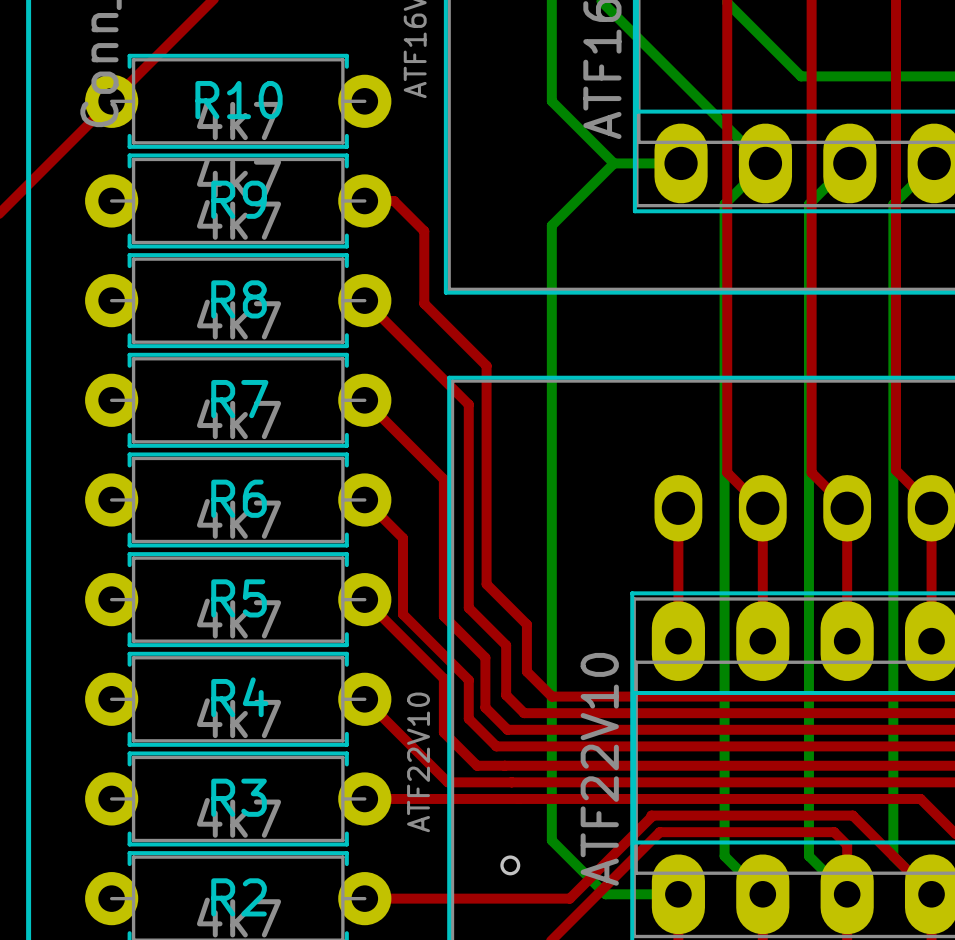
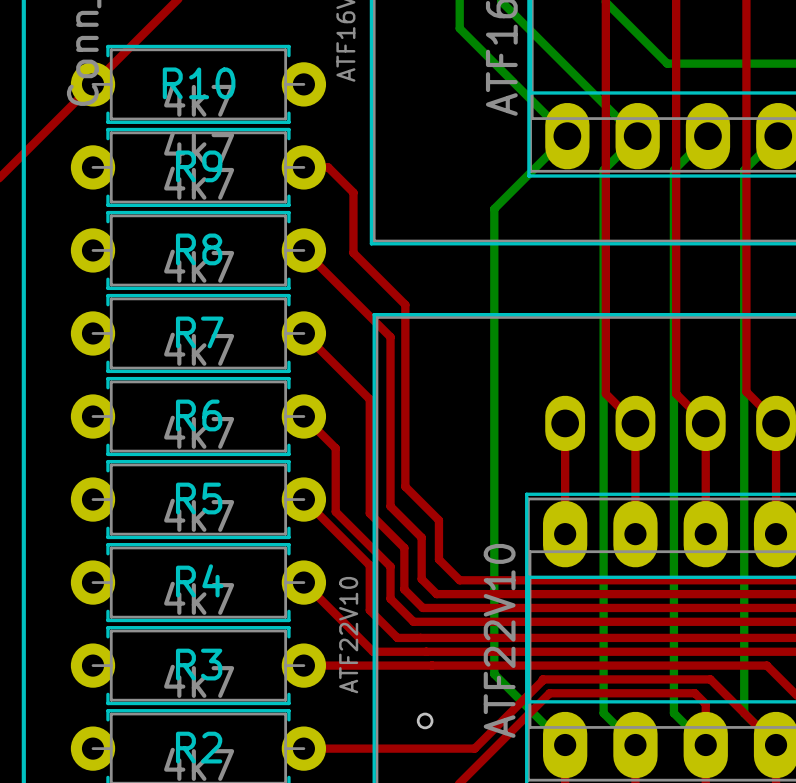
bottom track: (551, 34) (551, 101) (613, 163) -> (459, 28) (567, 136)
bottom track: (613, 163) (551, 225) (551, 840) (605, 894) (678, 894) -> (567, 136) (494, 208) (494, 674) (565, 745)
bottom track: (613, 163) (680, 163) -> none

